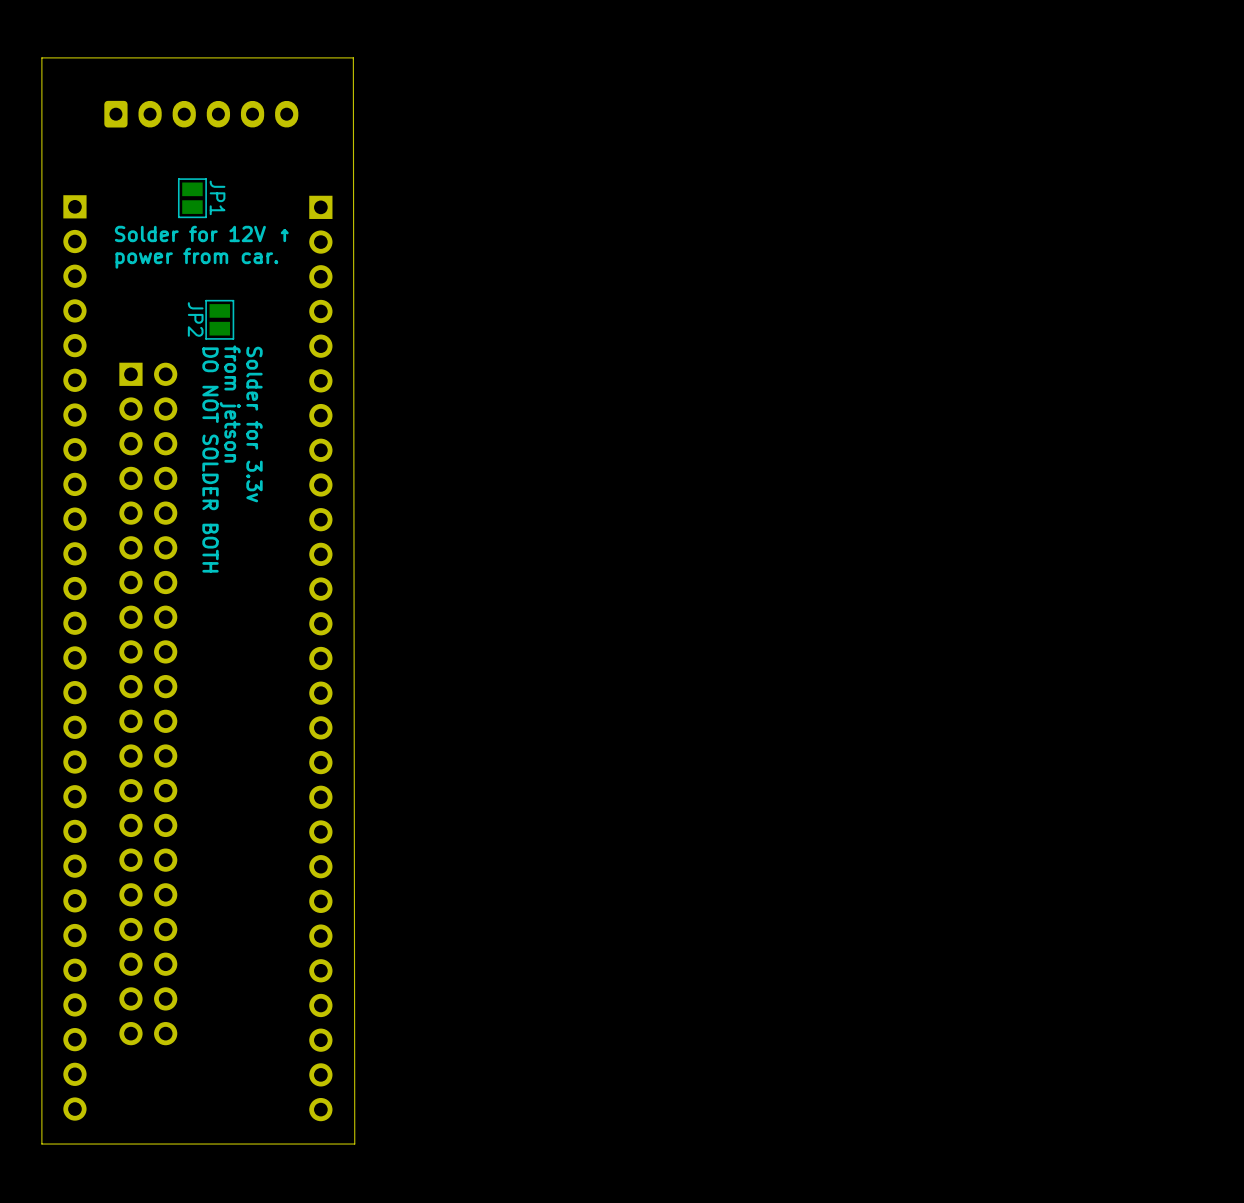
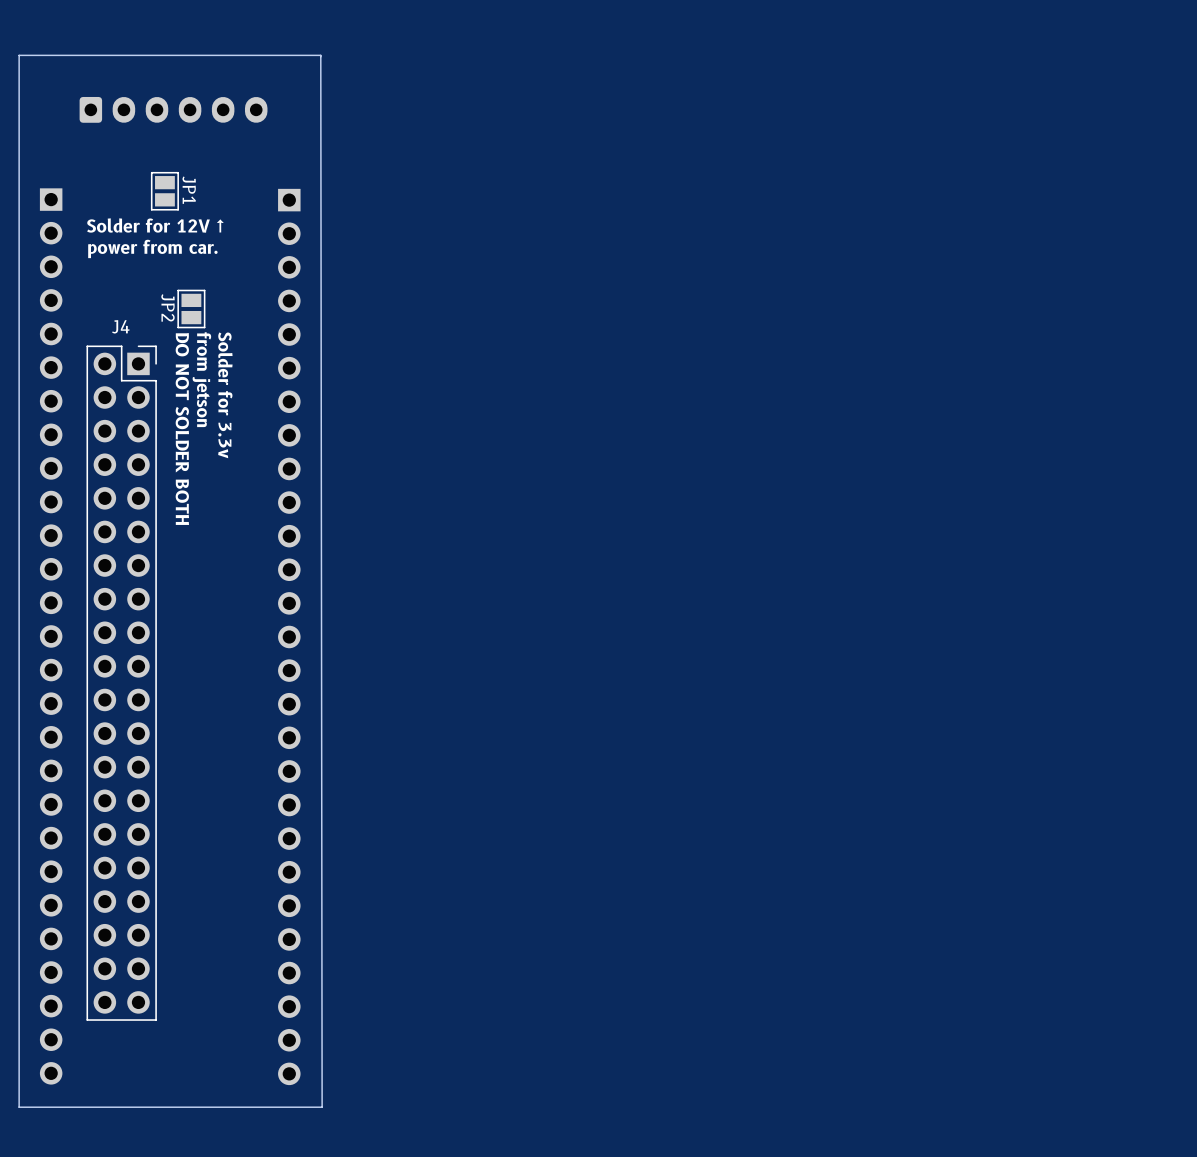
J4 side: top (148, 703) -> bottom (121, 683)

